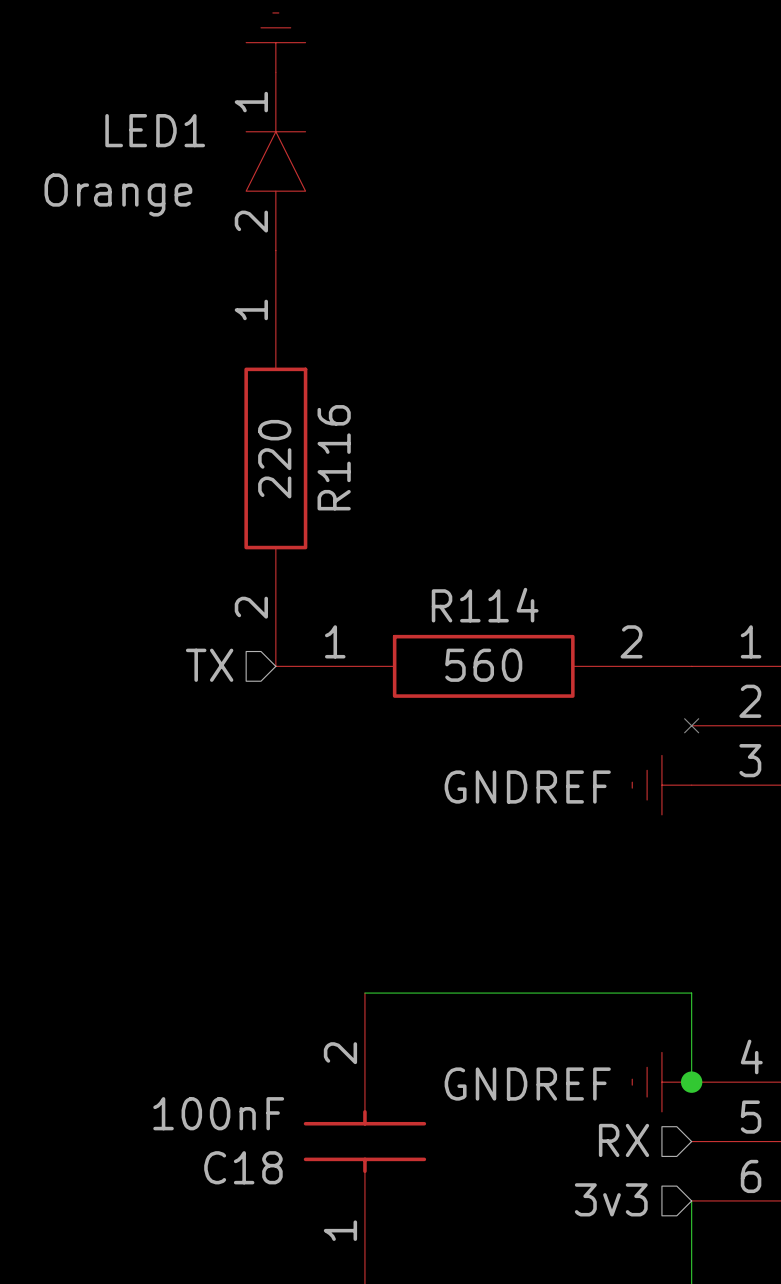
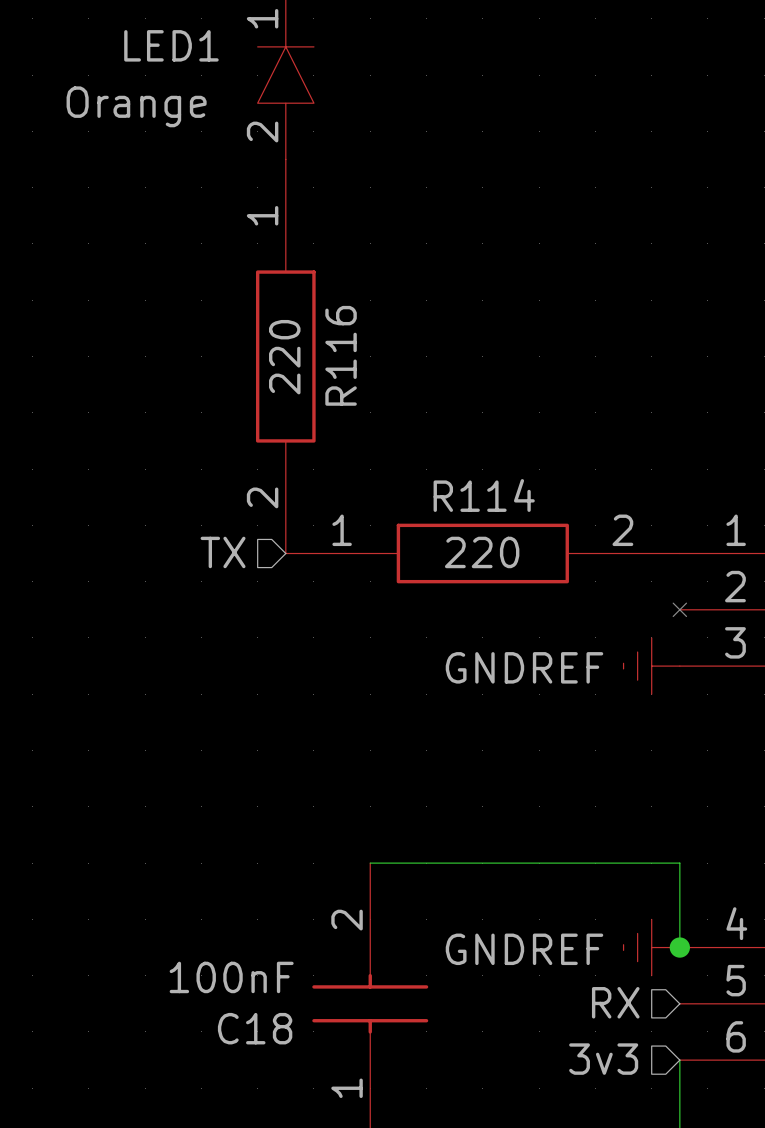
R114 text: 560 (483, 665) -> 220 (482, 552)

